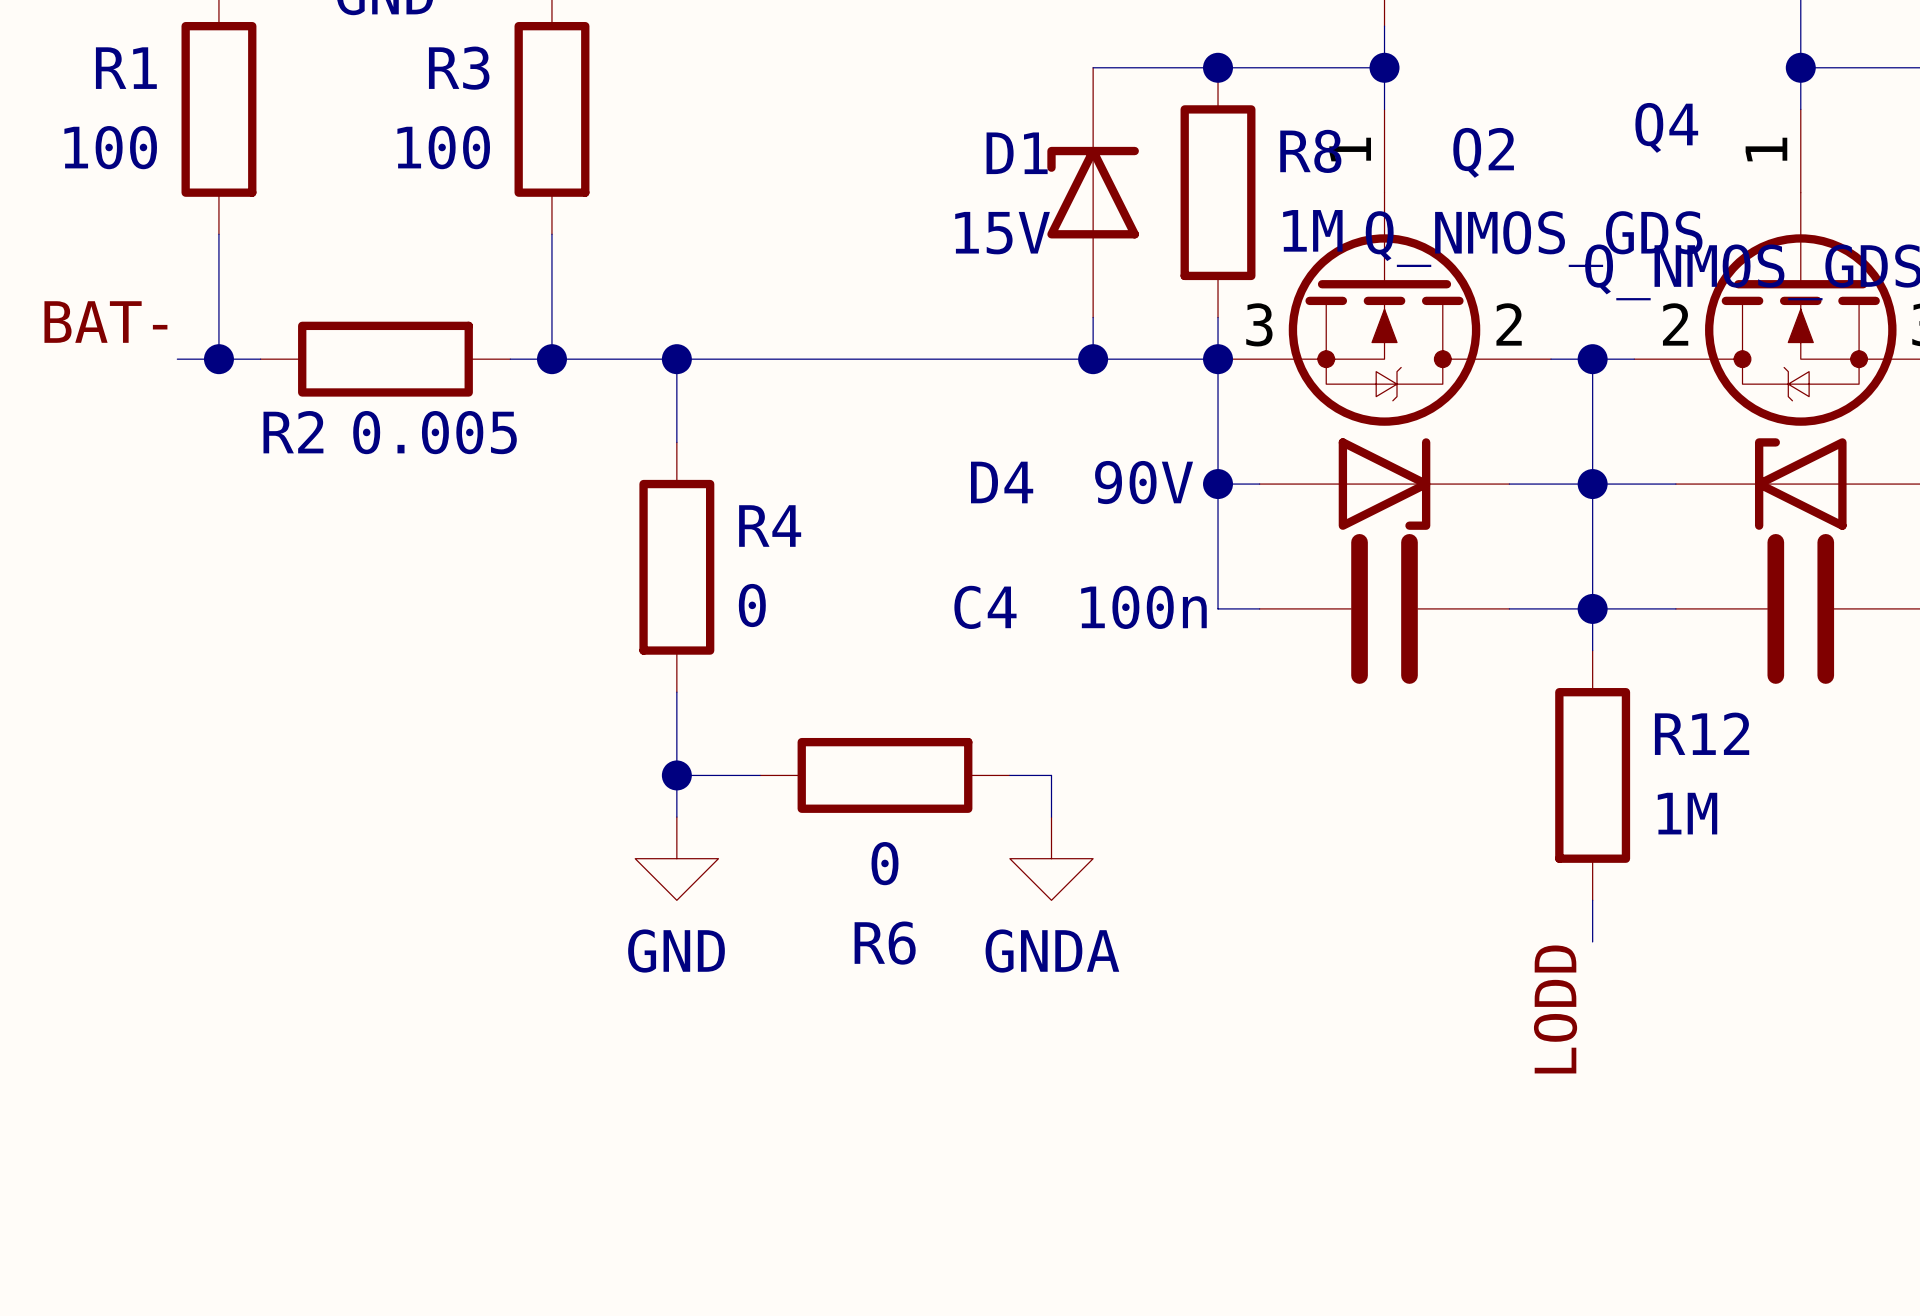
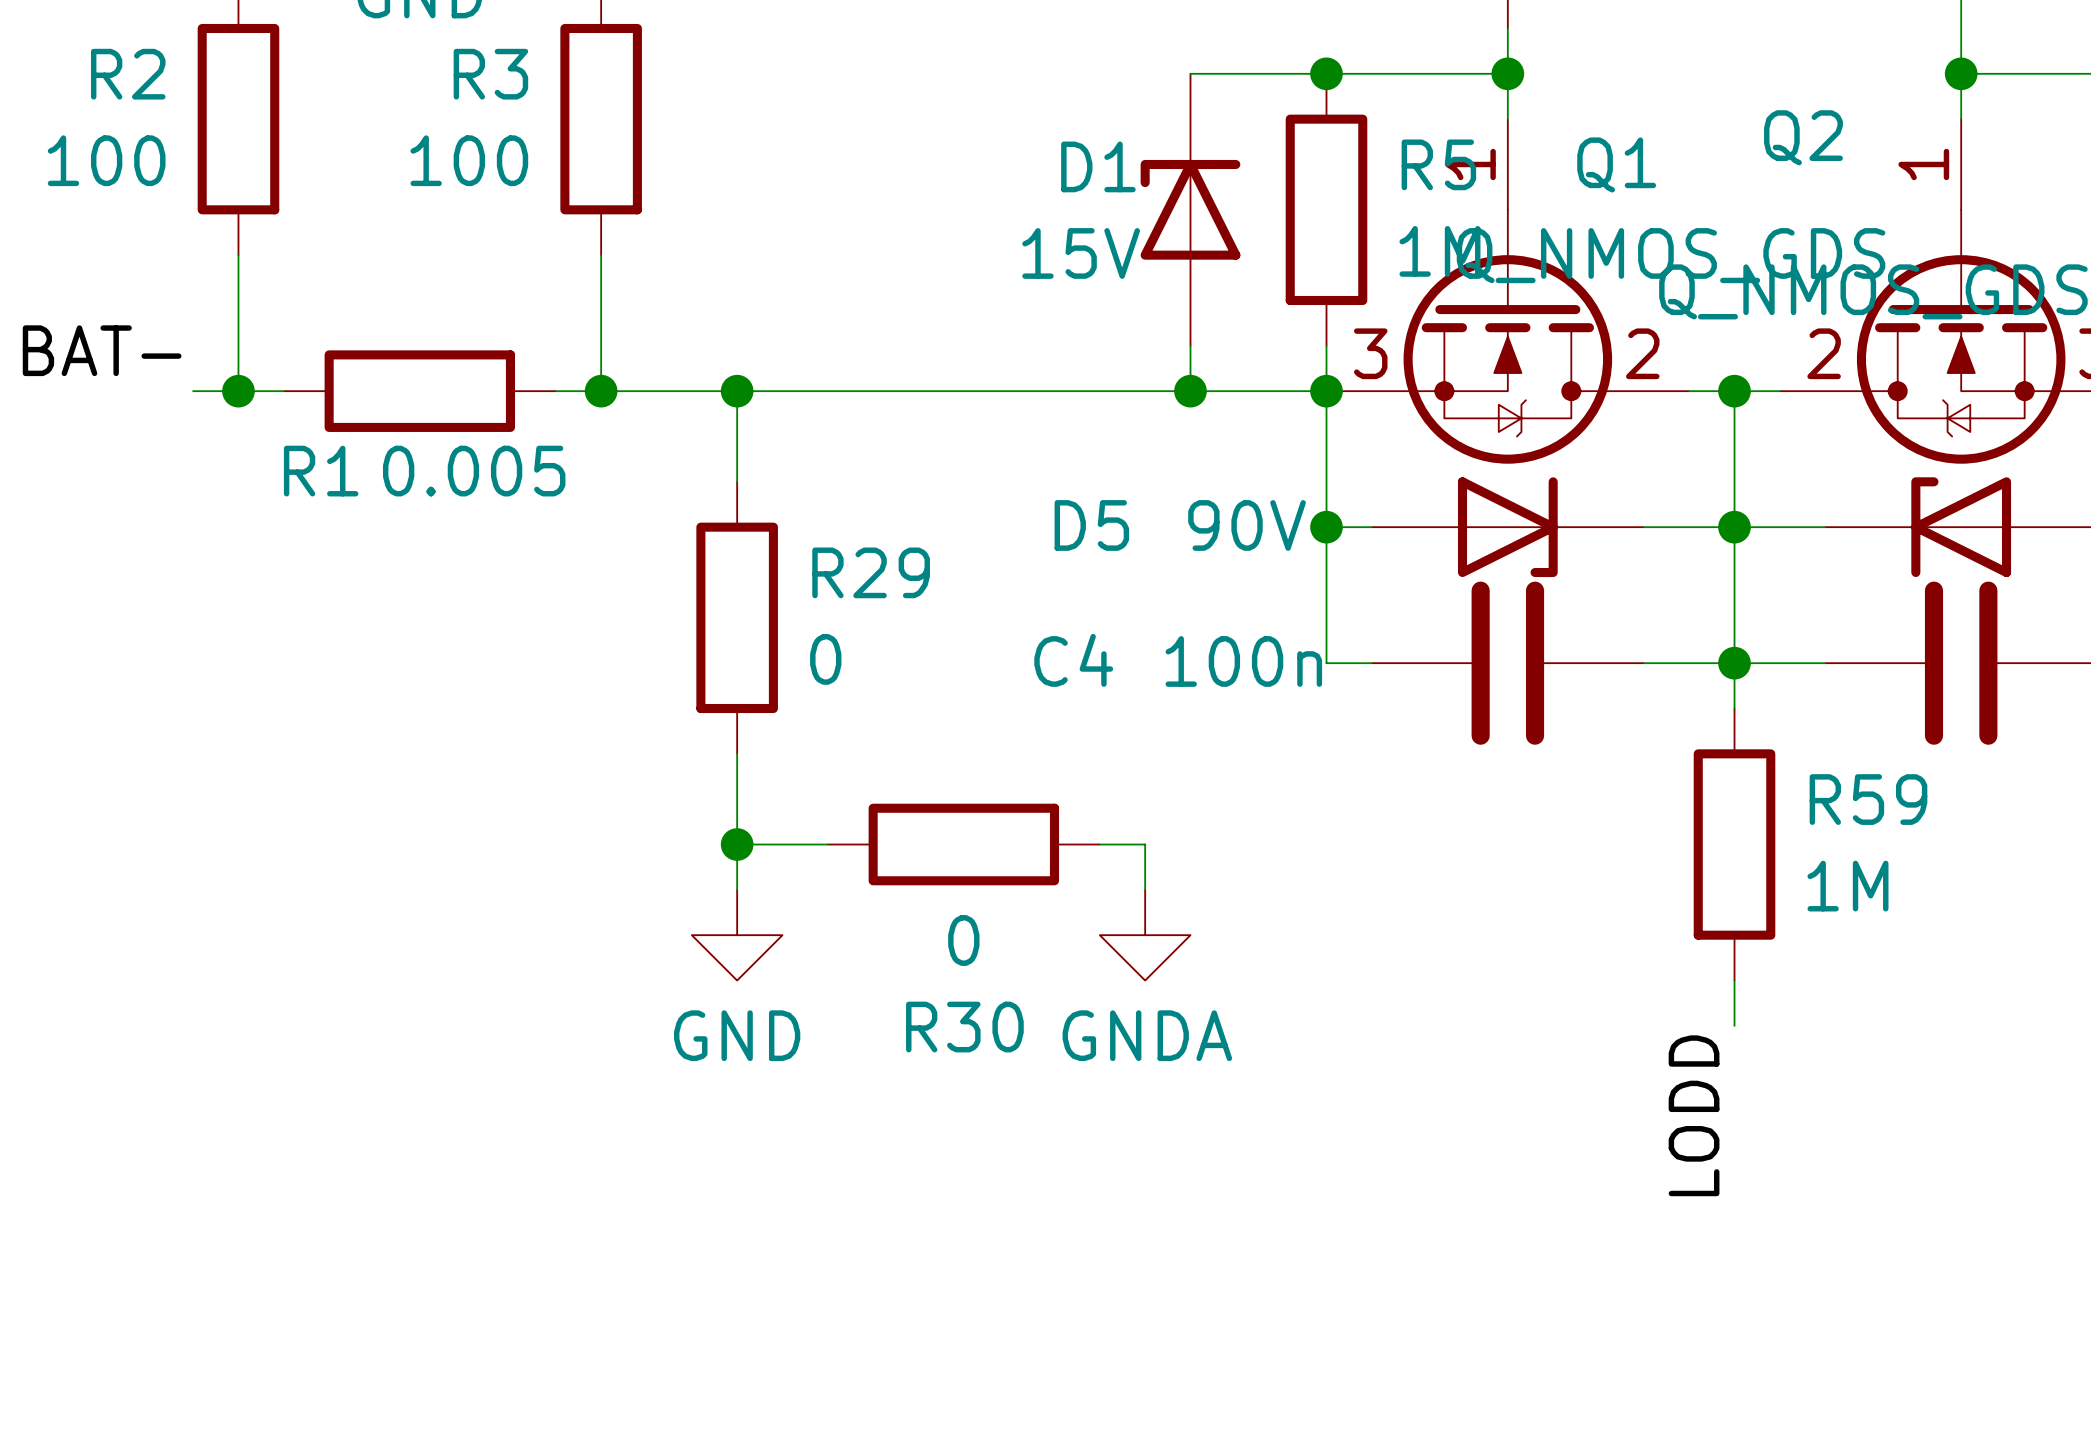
R1 name: R1 (126, 68) -> R2 (128, 74)
Q4 name: Q4 (1666, 127) -> Q2 (1803, 137)
R8 name: R8 (1310, 151) -> R5 (1438, 164)
Q2 name: Q2 (1483, 152) -> Q1 (1616, 164)
R2 name: R2 (293, 432) -> R1 (321, 471)
D4 name: D4 (1002, 482) -> D5 (1091, 525)
R4 name: R4 (770, 526) -> R29 (871, 572)
R12 name: R12 (1702, 733) -> R59 (1868, 799)
R6 name: R6 (885, 943) -> R30 (964, 1027)

